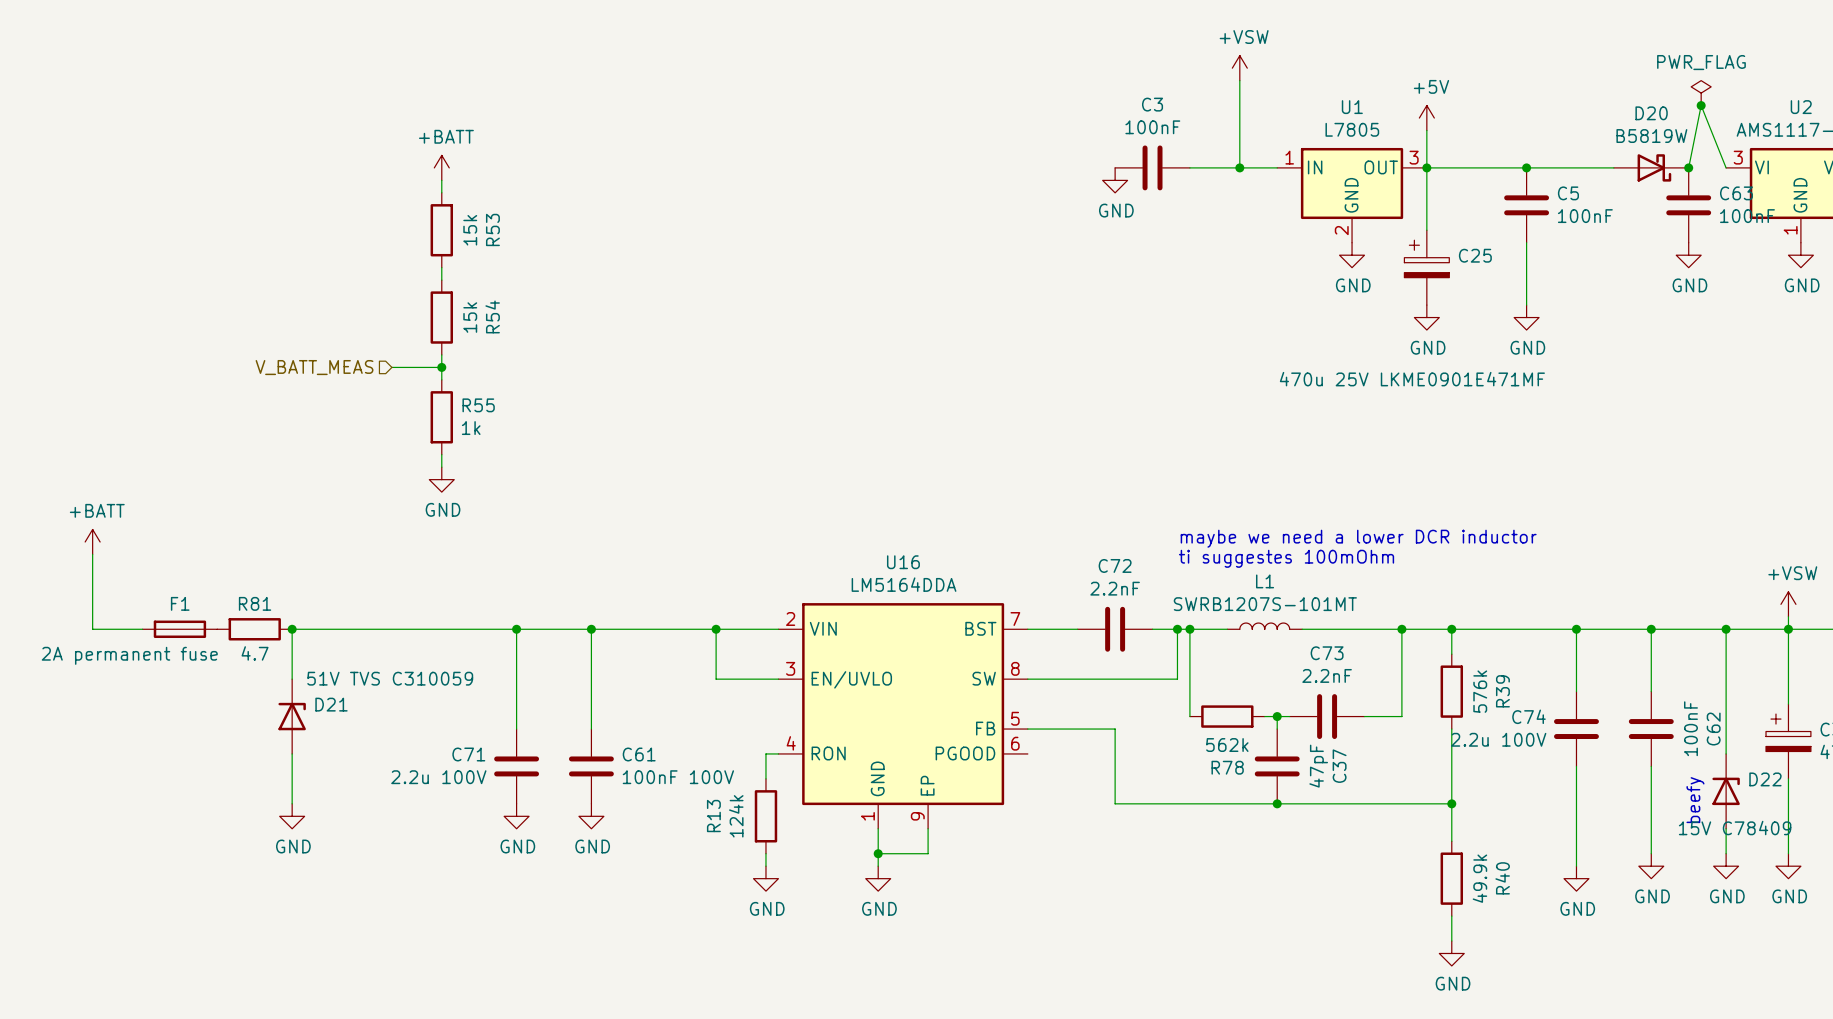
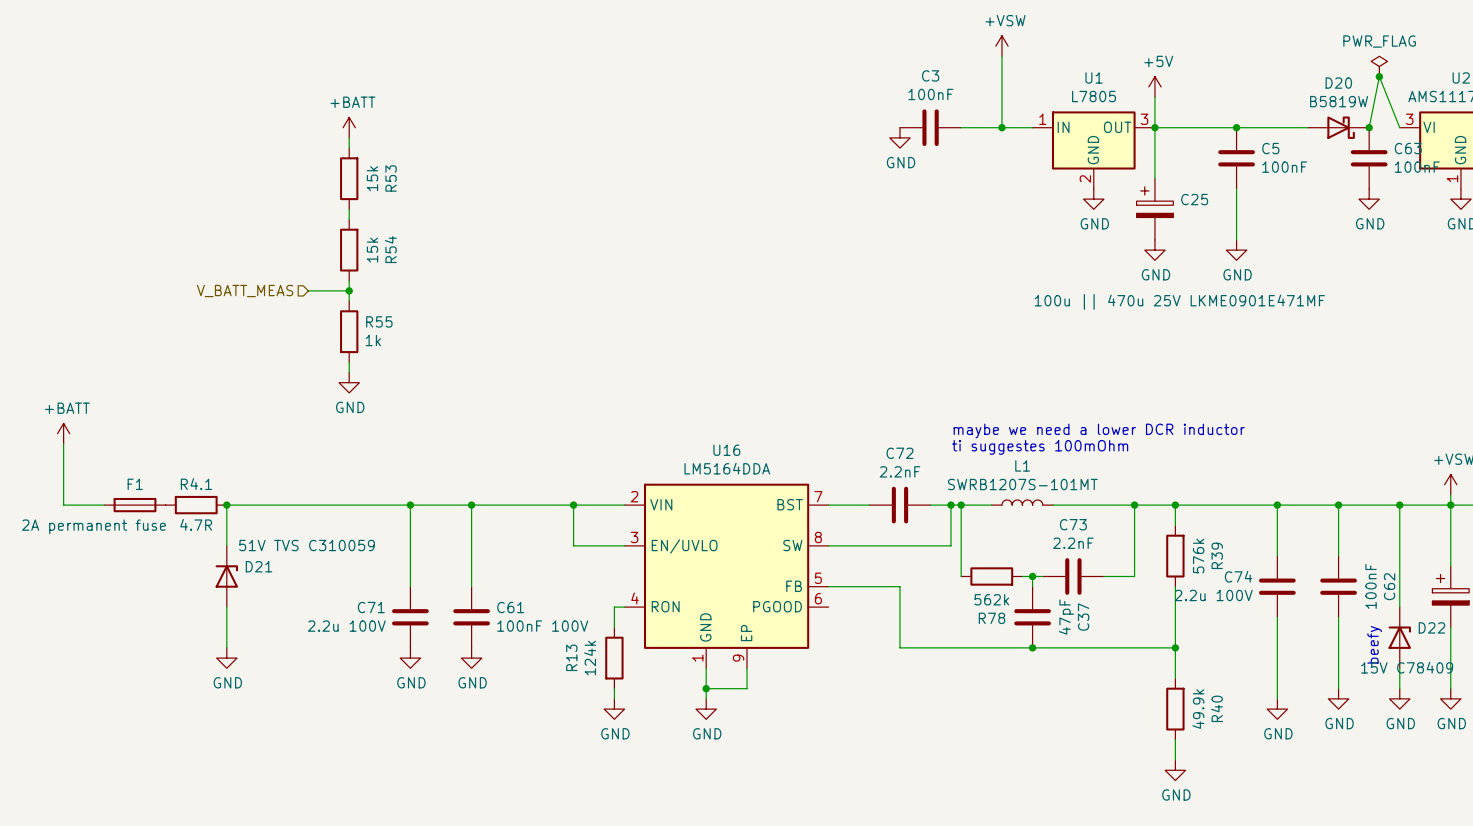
C25 value: 470u 25V LKME0901E471MF (1412, 379) -> 100u || 470u 25V LKME0901E471MF (1179, 301)
R81 name: R81 (255, 603) -> R4.1 (196, 484)
R81 value: 4.7 (255, 653) -> 4.7R (196, 524)

